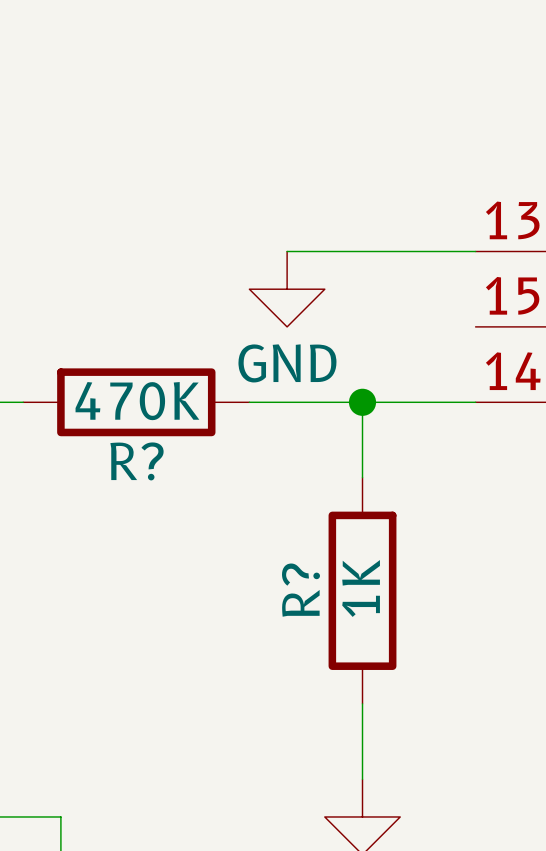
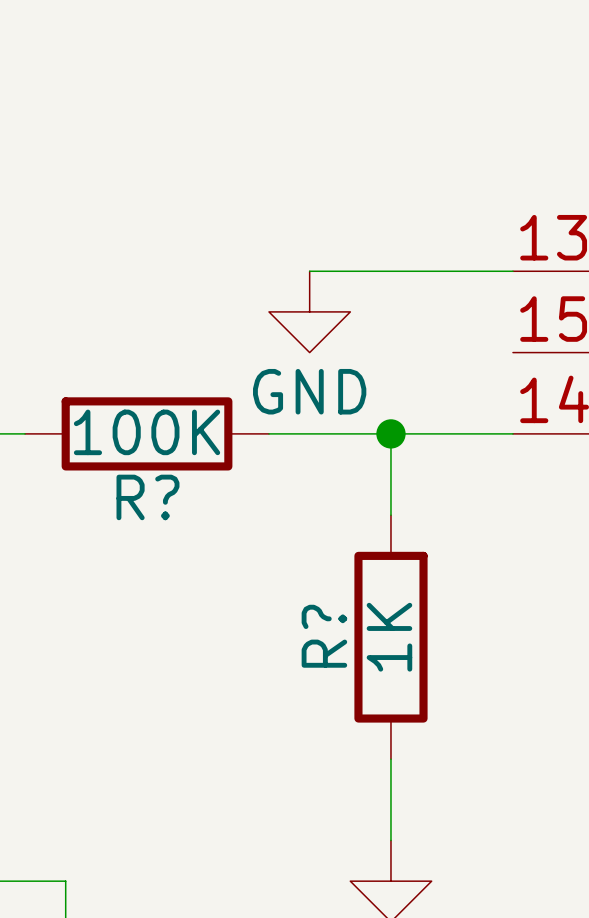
R? value: 470K (137, 401) -> 100K (147, 432)

